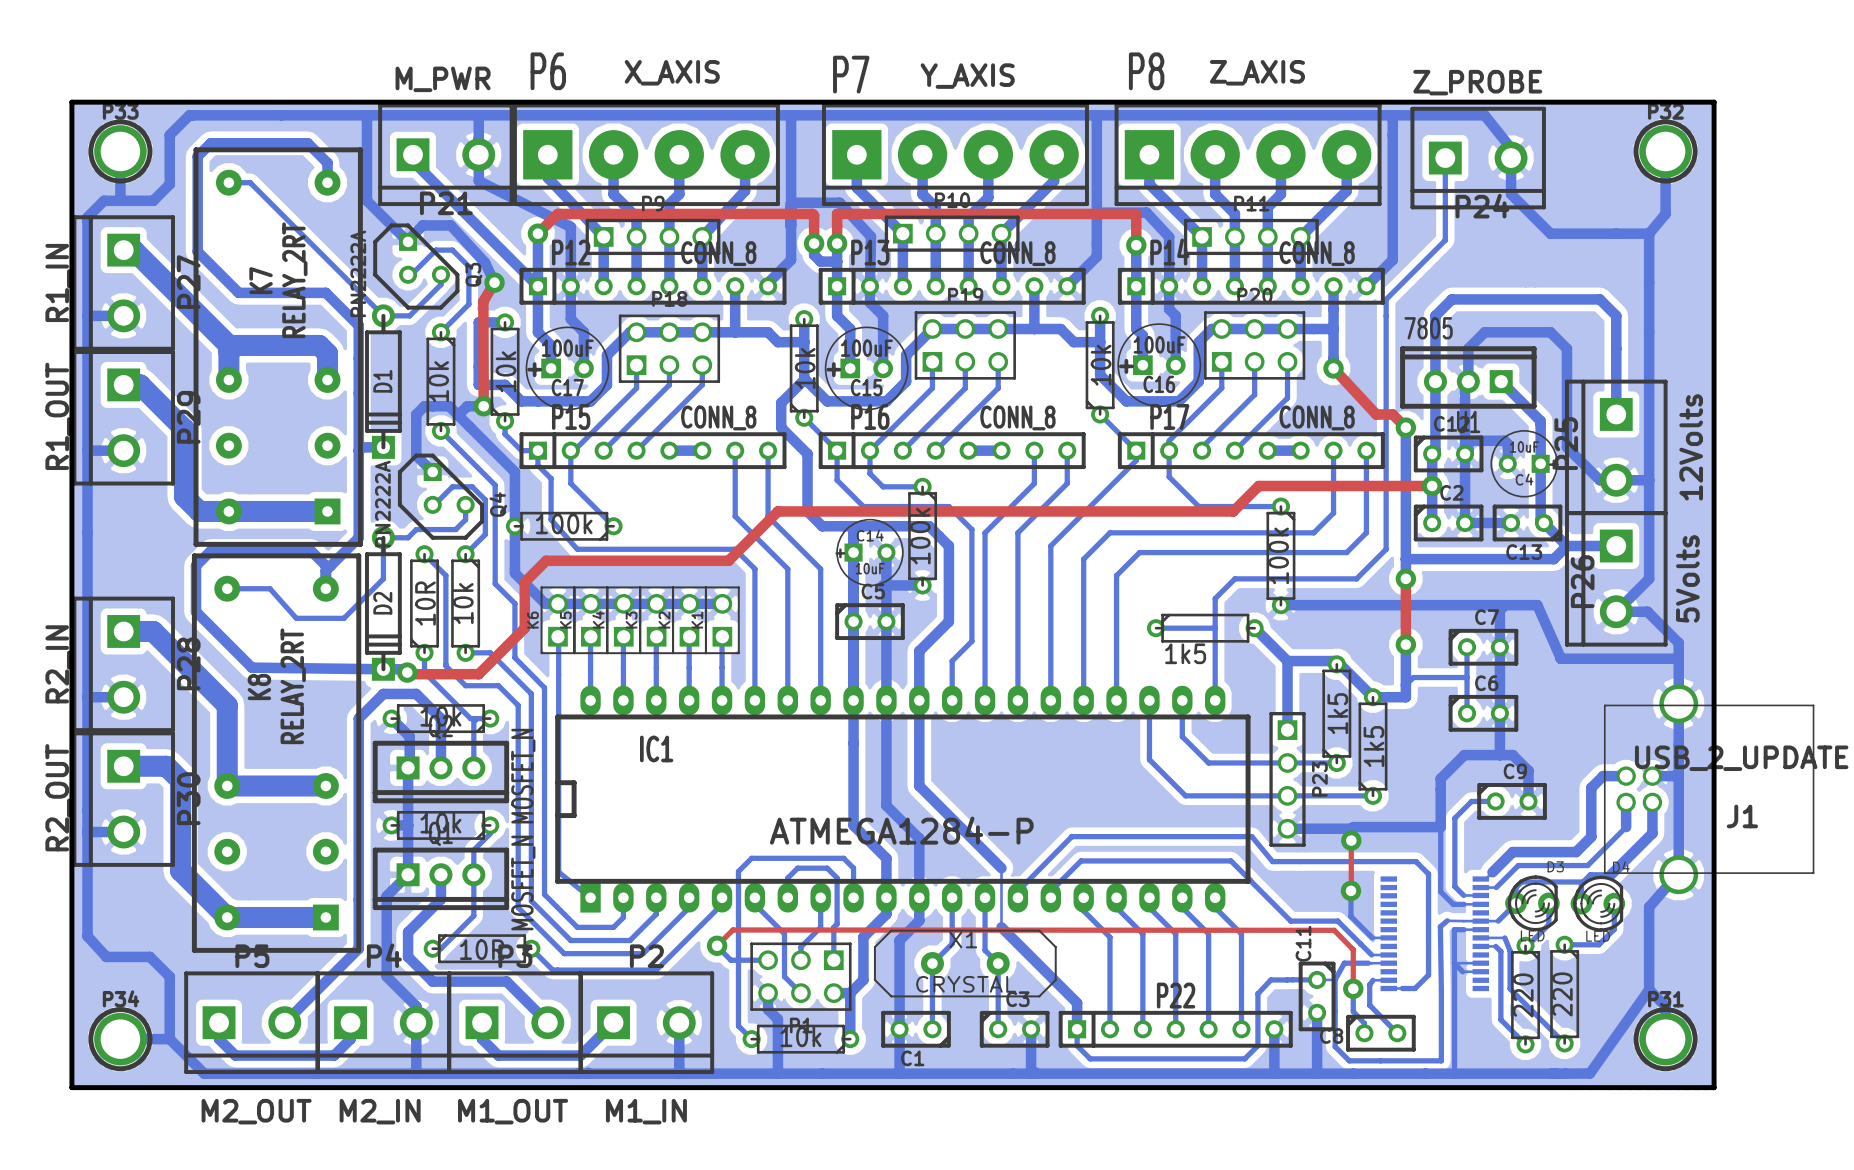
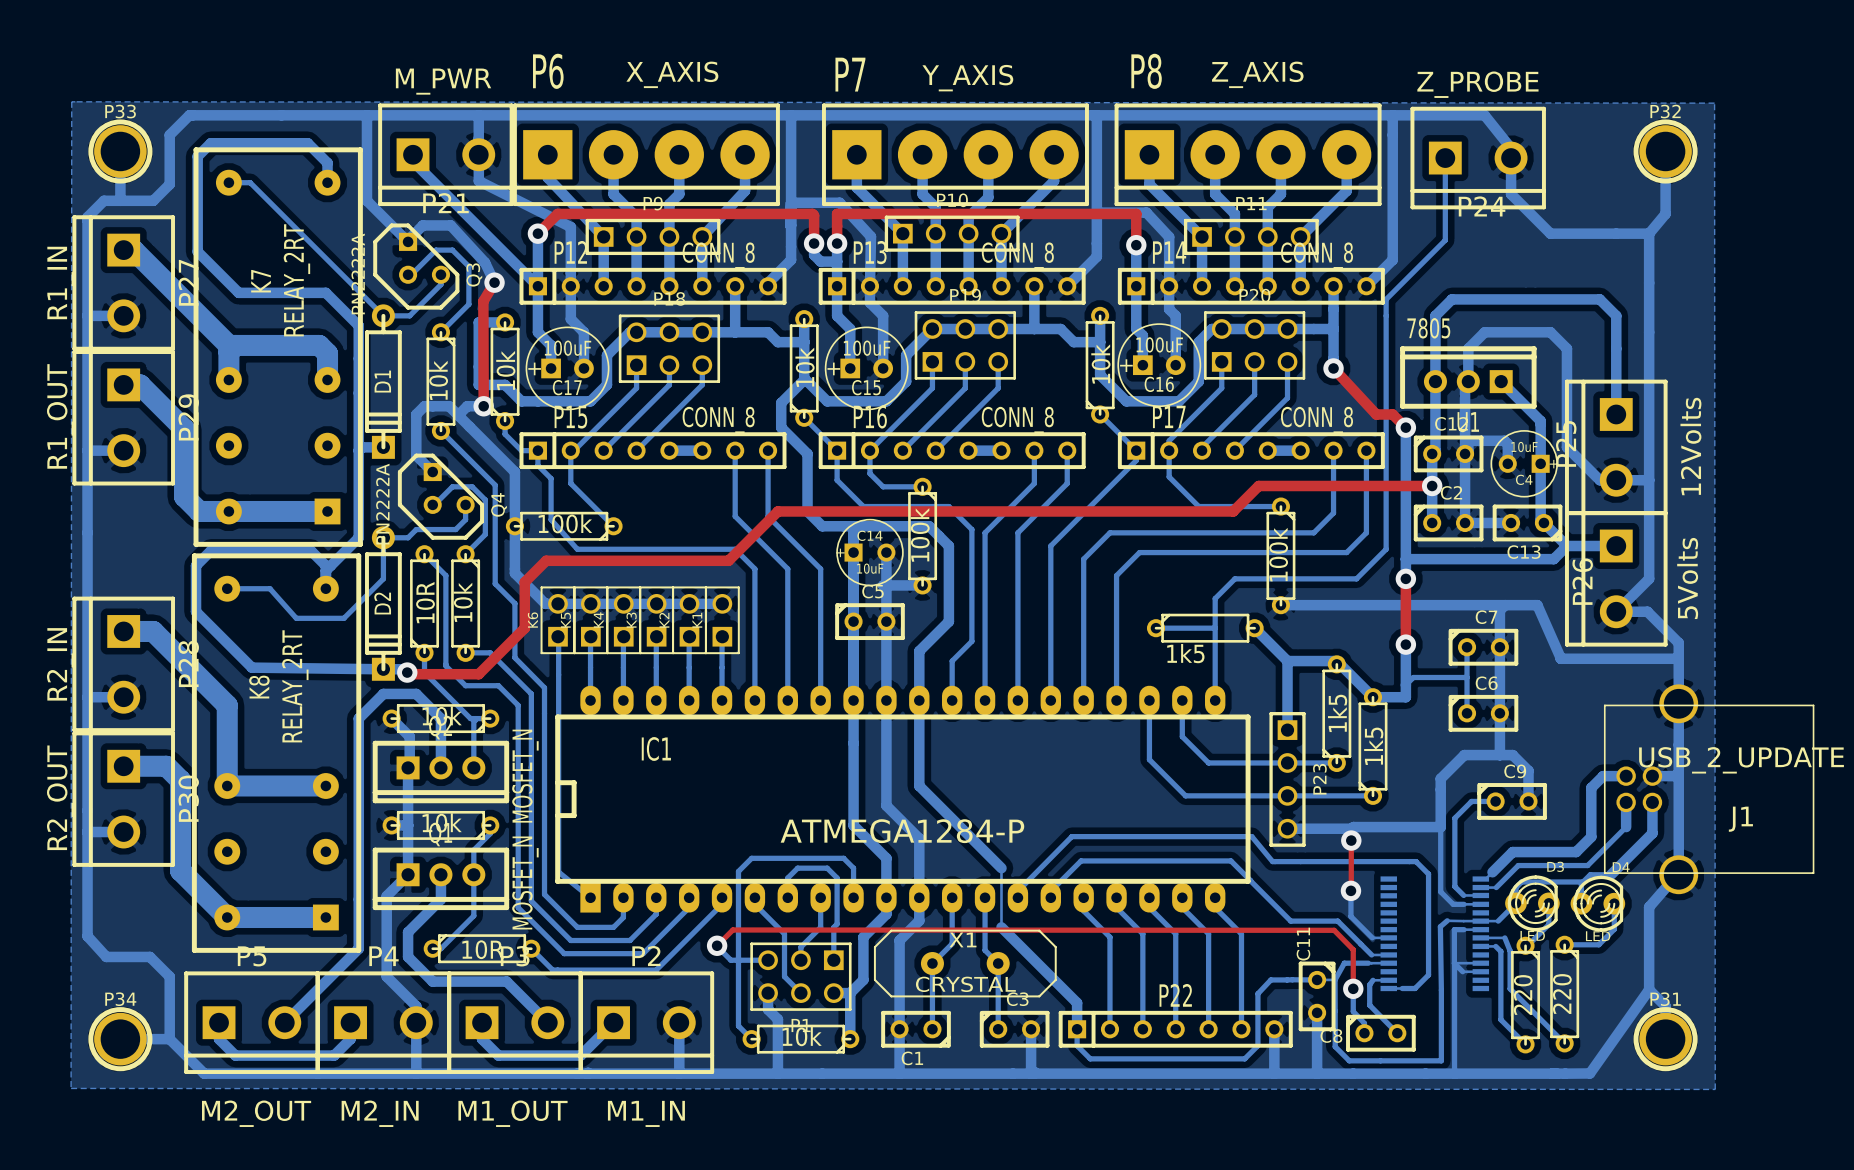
board edge: (71, 102) (1714, 102) (1714, 1087) (71, 1087) (71, 102) -> none

